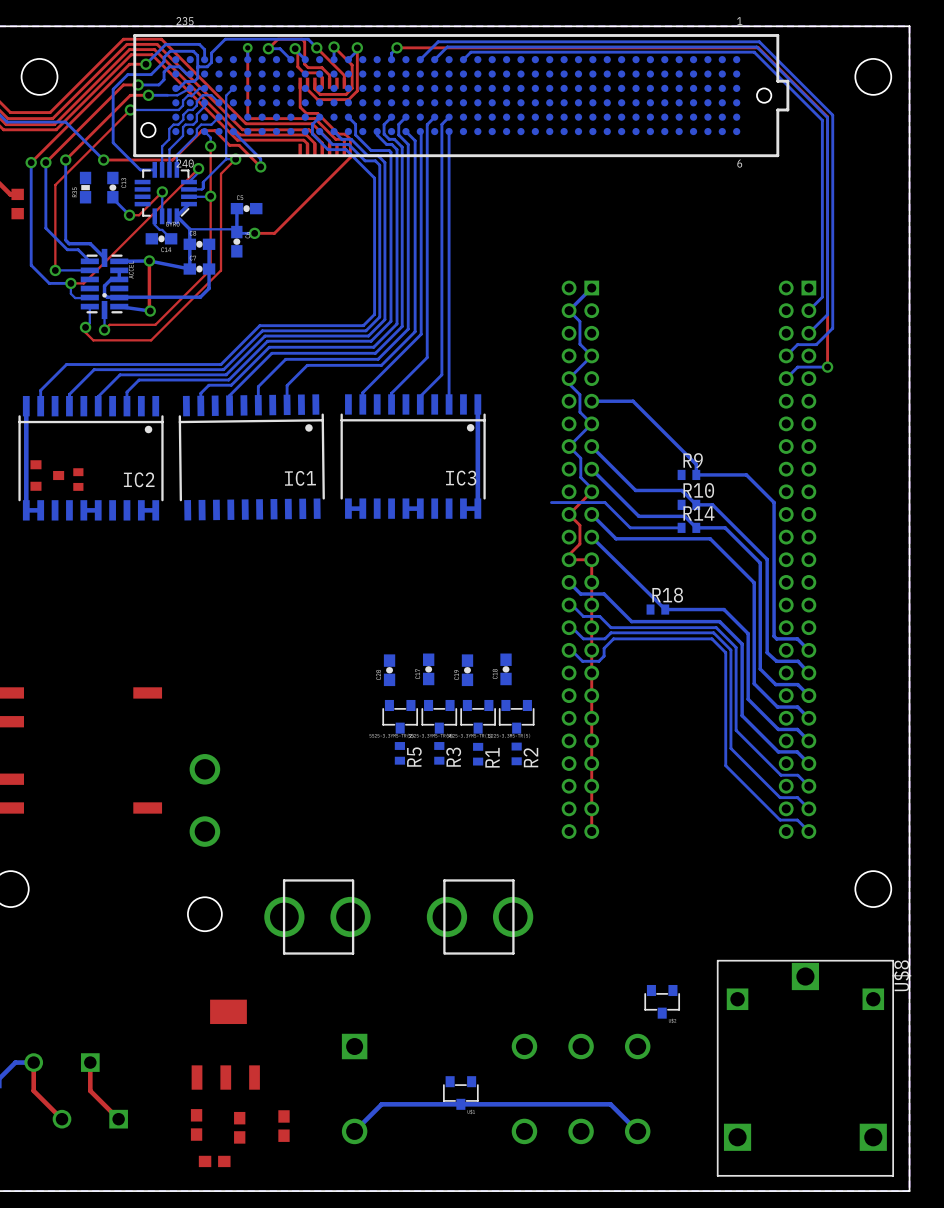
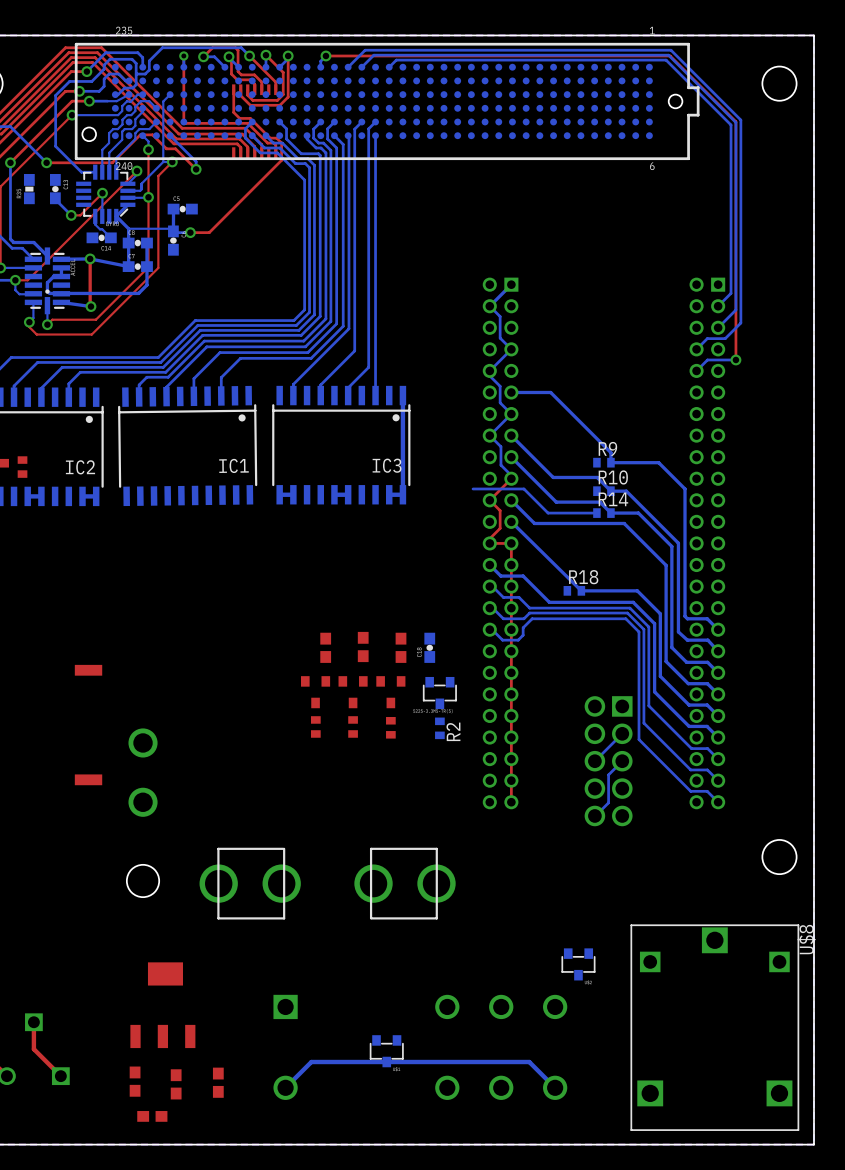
part side: bottom (428, 669) -> top (363, 647)
part side: bottom (389, 670) -> top (325, 647)
part side: bottom (467, 670) -> top (401, 647)
part side: bottom (400, 716) -> top (315, 692)
part side: bottom (439, 716) -> top (353, 692)
part side: bottom (478, 716) -> top (390, 692)
R5 side: bottom (399, 753) -> top (315, 726)
R3 side: bottom (439, 753) -> top (353, 726)
R1 side: bottom (478, 754) -> top (390, 727)
bottom track: none -> (622, 733) (594, 761)
part: none -> (608, 761)
bottom track: none -> (622, 761) (608, 774) (608, 802) (594, 815)

